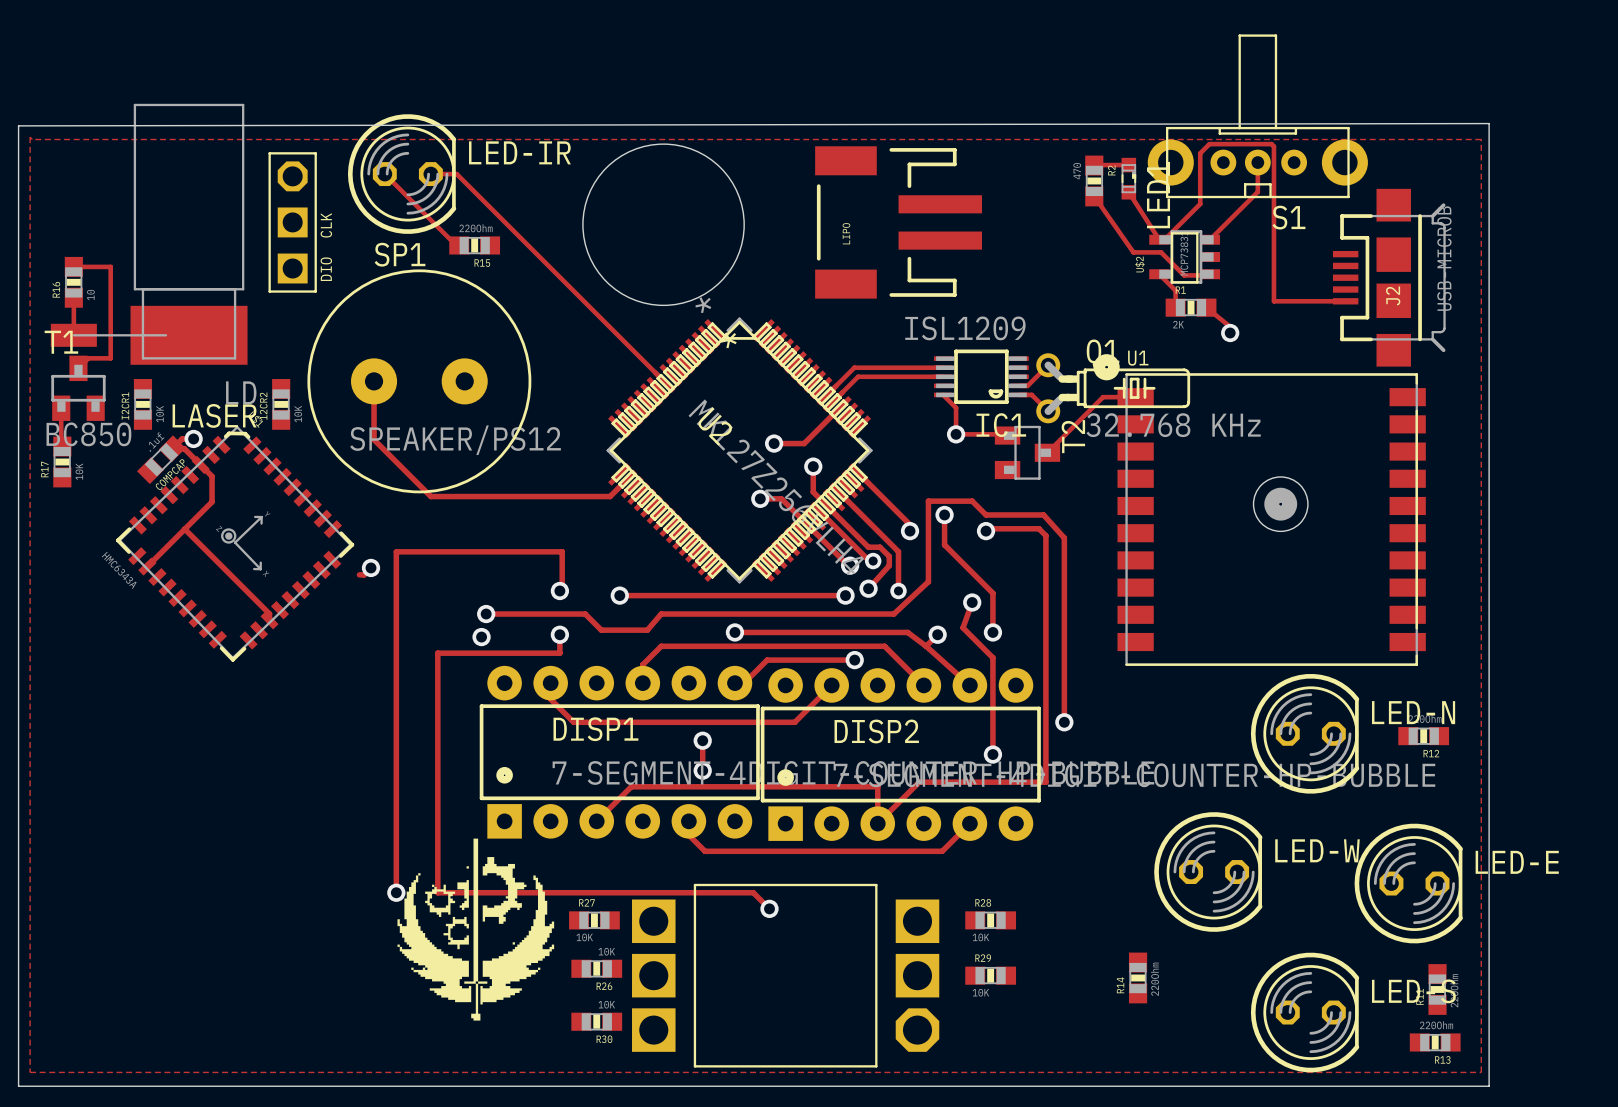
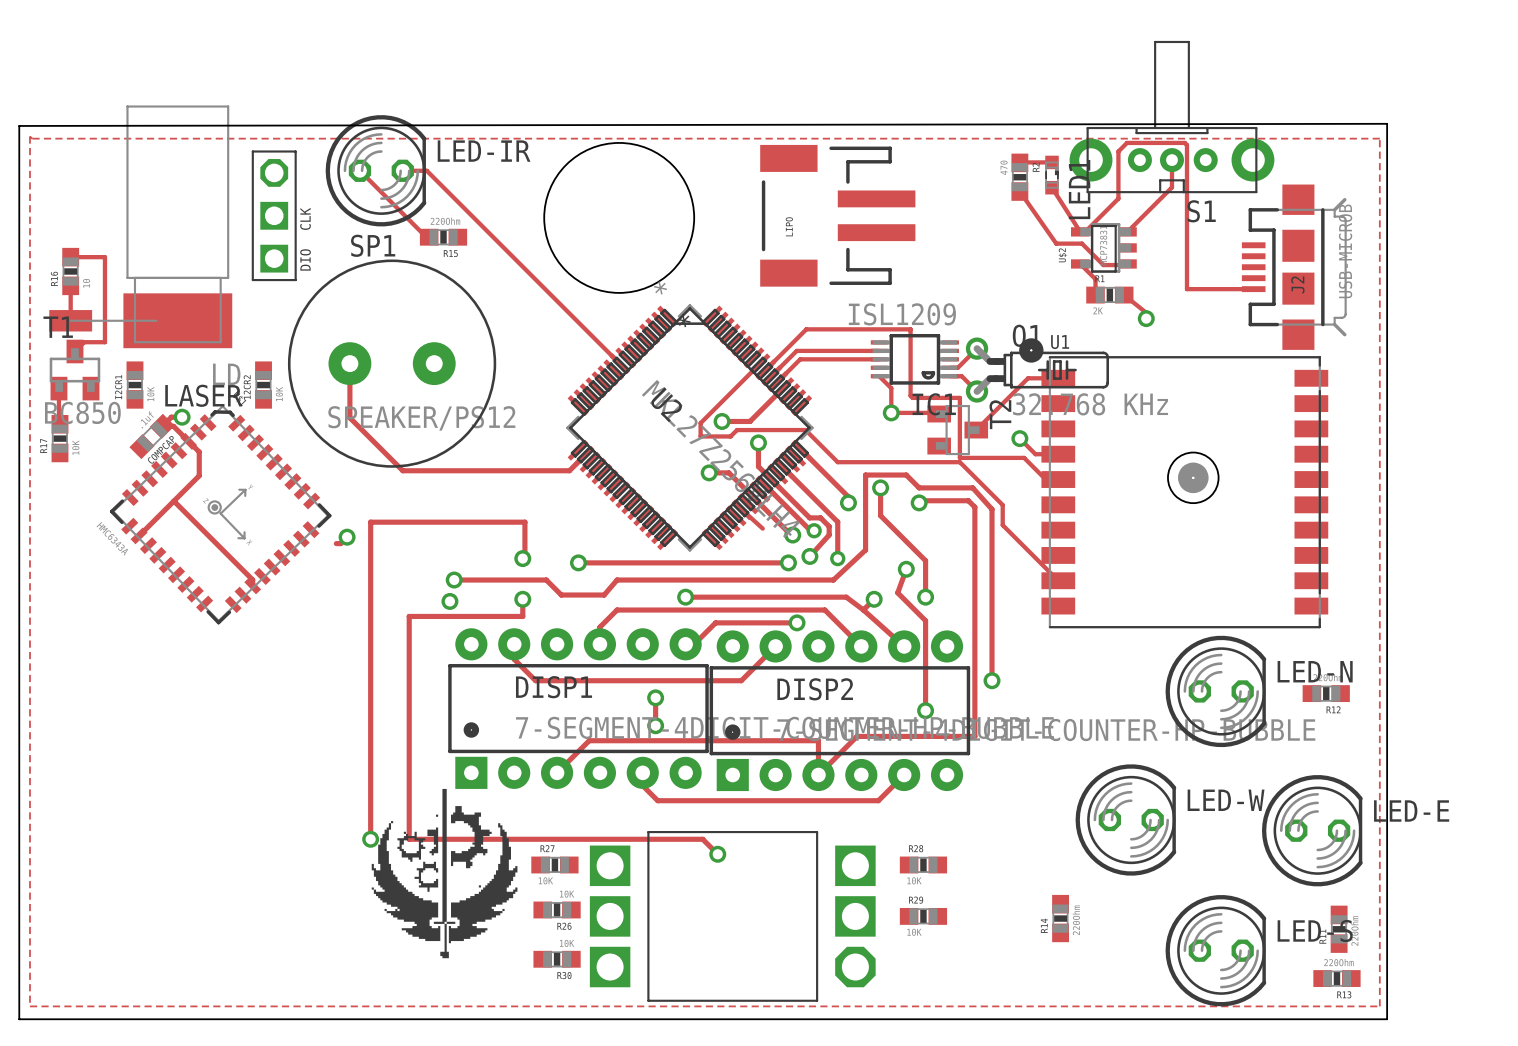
track: none -> (759, 363) (700, 423) (700, 436) (730, 436) (737, 430) (805, 430) (837, 462) (959, 462) (1002, 505) (1002, 525) (1058, 580)
track: none -> (765, 369) (806, 329) (910, 329) (910, 395) (912, 397) (959, 397) (959, 457) (1024, 457) (1049, 483) (1053, 479) (1058, 479)
track: none -> (1019, 438) (1035, 454) (1058, 454)
via: none -> (1019, 438)
track: none -> (742, 509) (762, 528)

